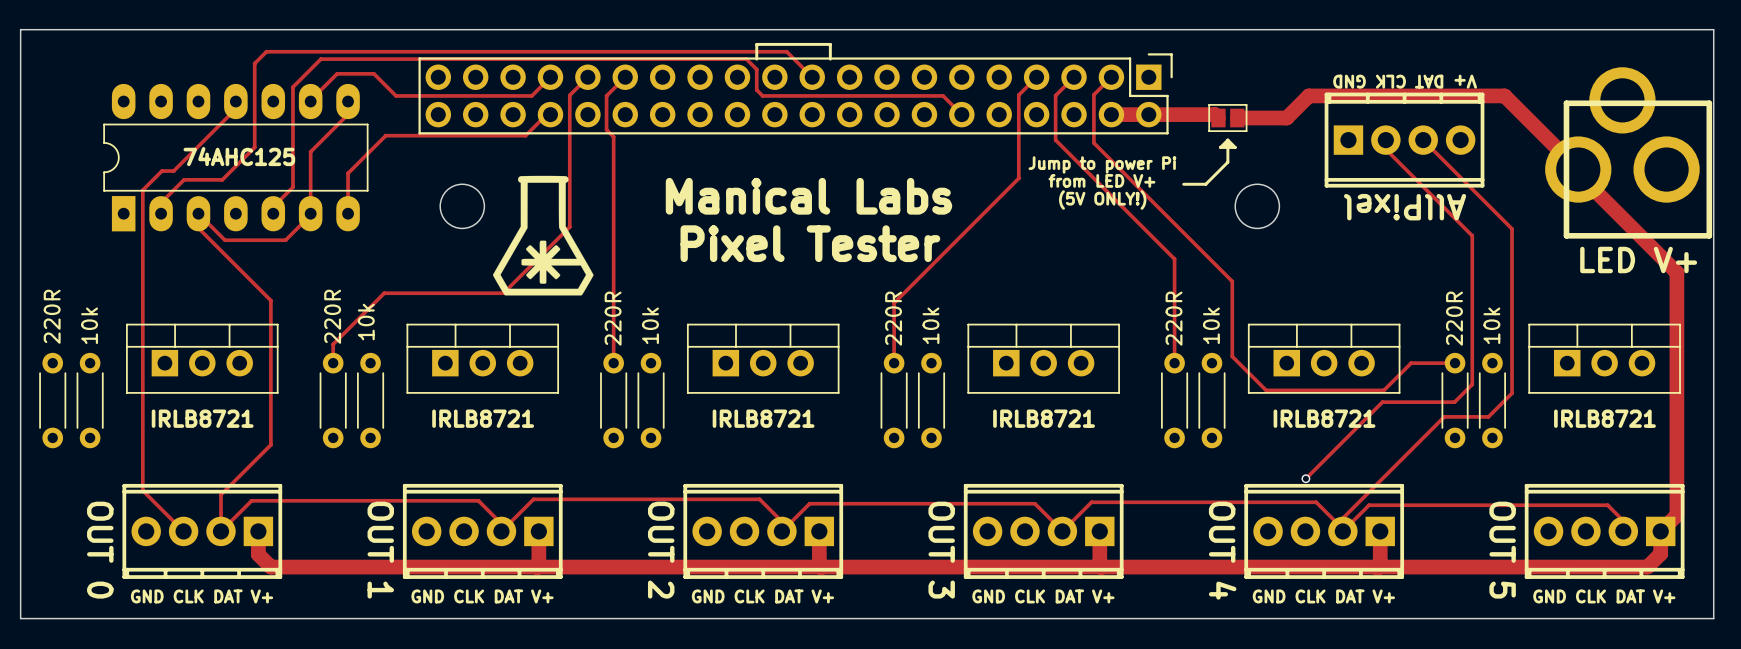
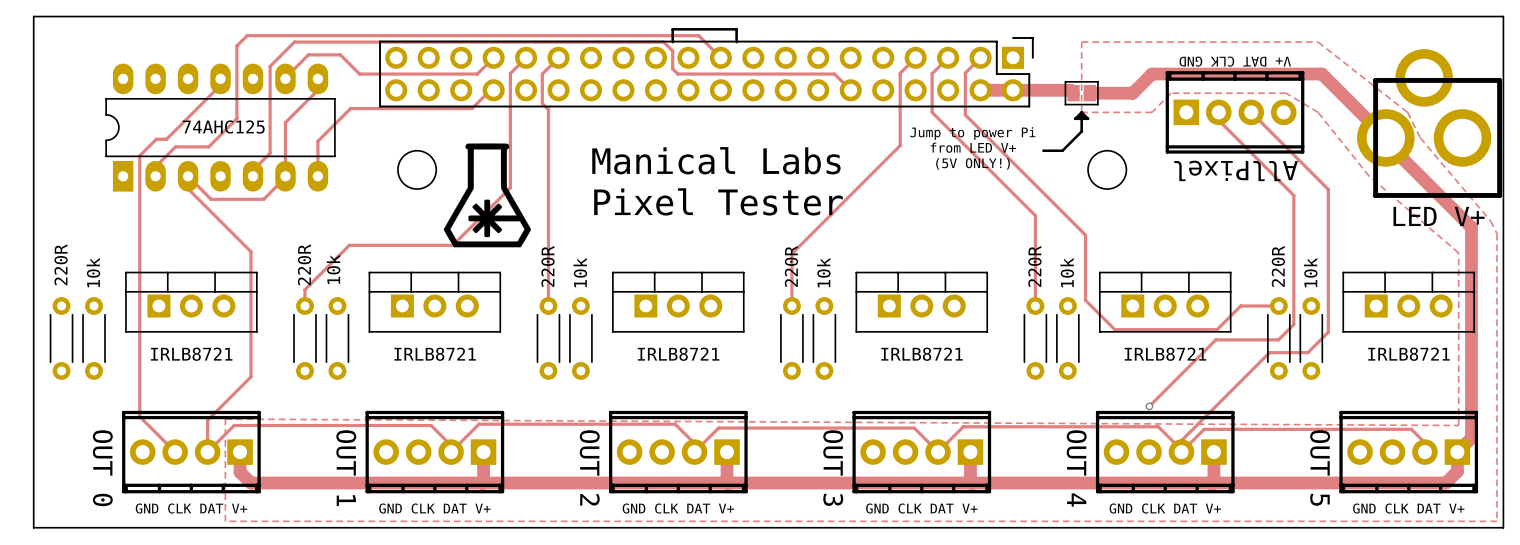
zone outline: none -> (1081, 42) (1081, 112) (1151, 112) (1171, 93) (1286, 93) (1318, 112) (1369, 176) (1458, 252) (1458, 425) (225, 419) (225, 521) (1497, 521) (1497, 233) (1490, 221) (1420, 137) (1407, 112) (1318, 42) (1081, 42)

